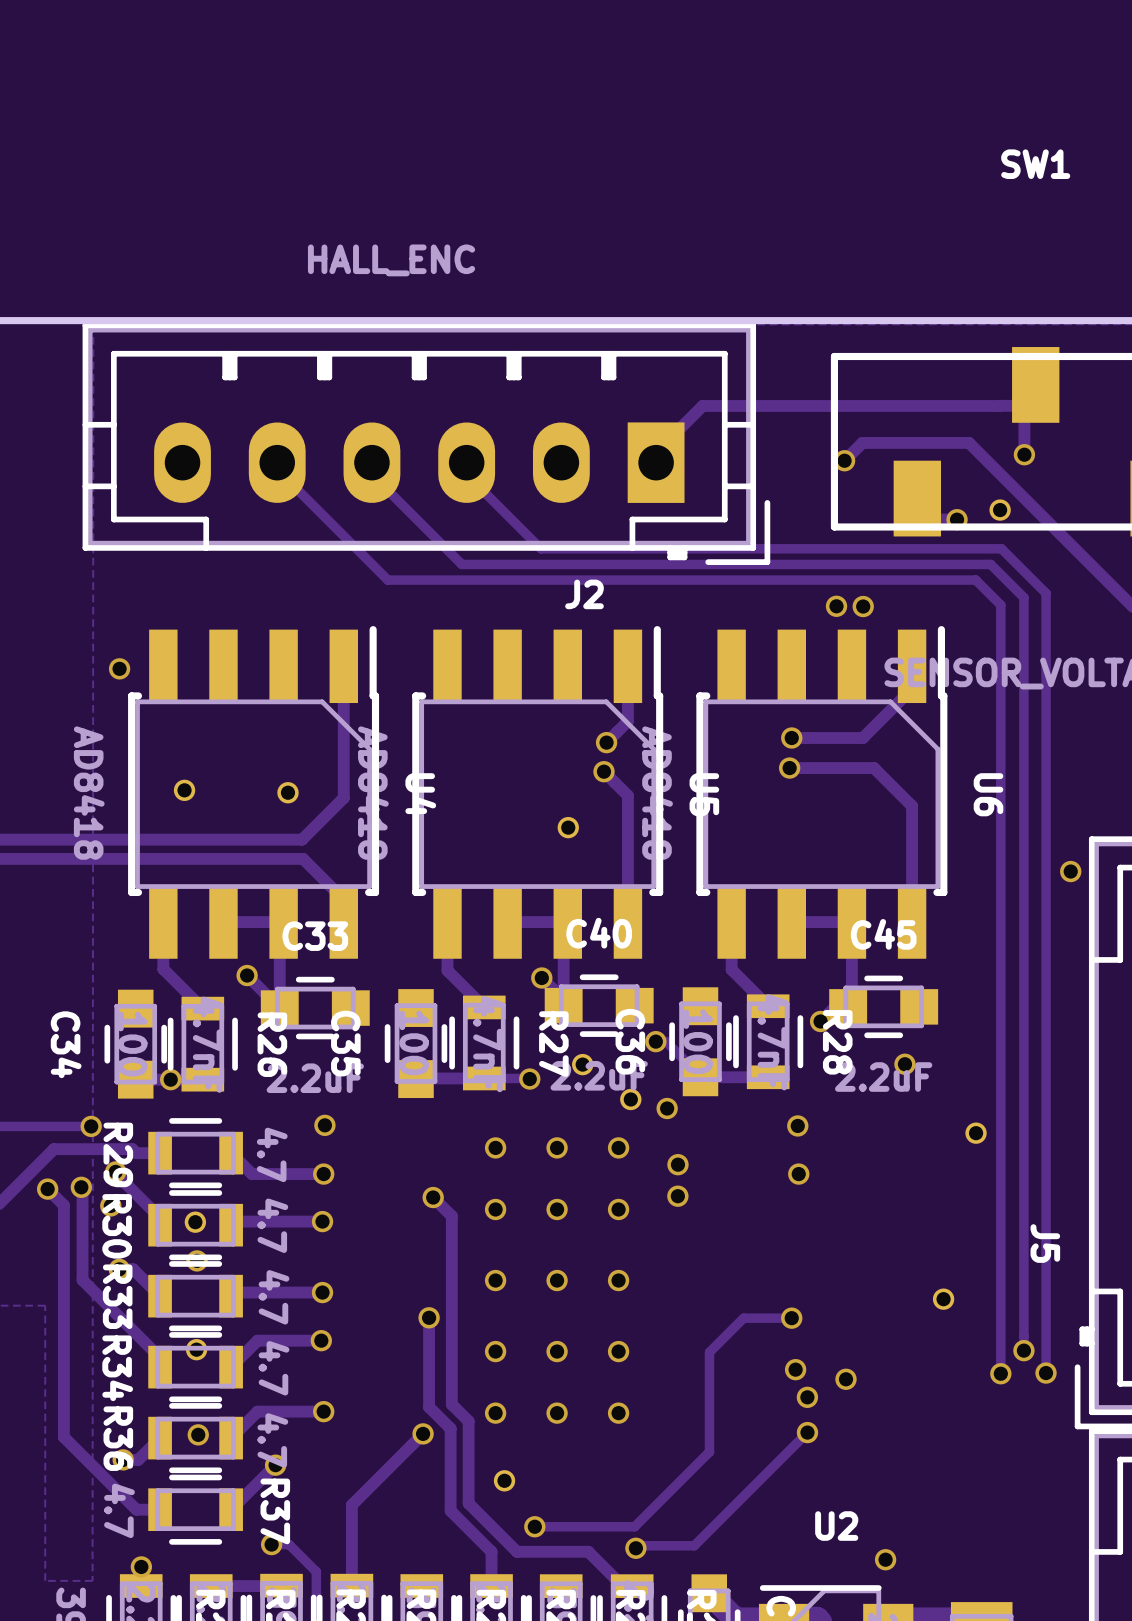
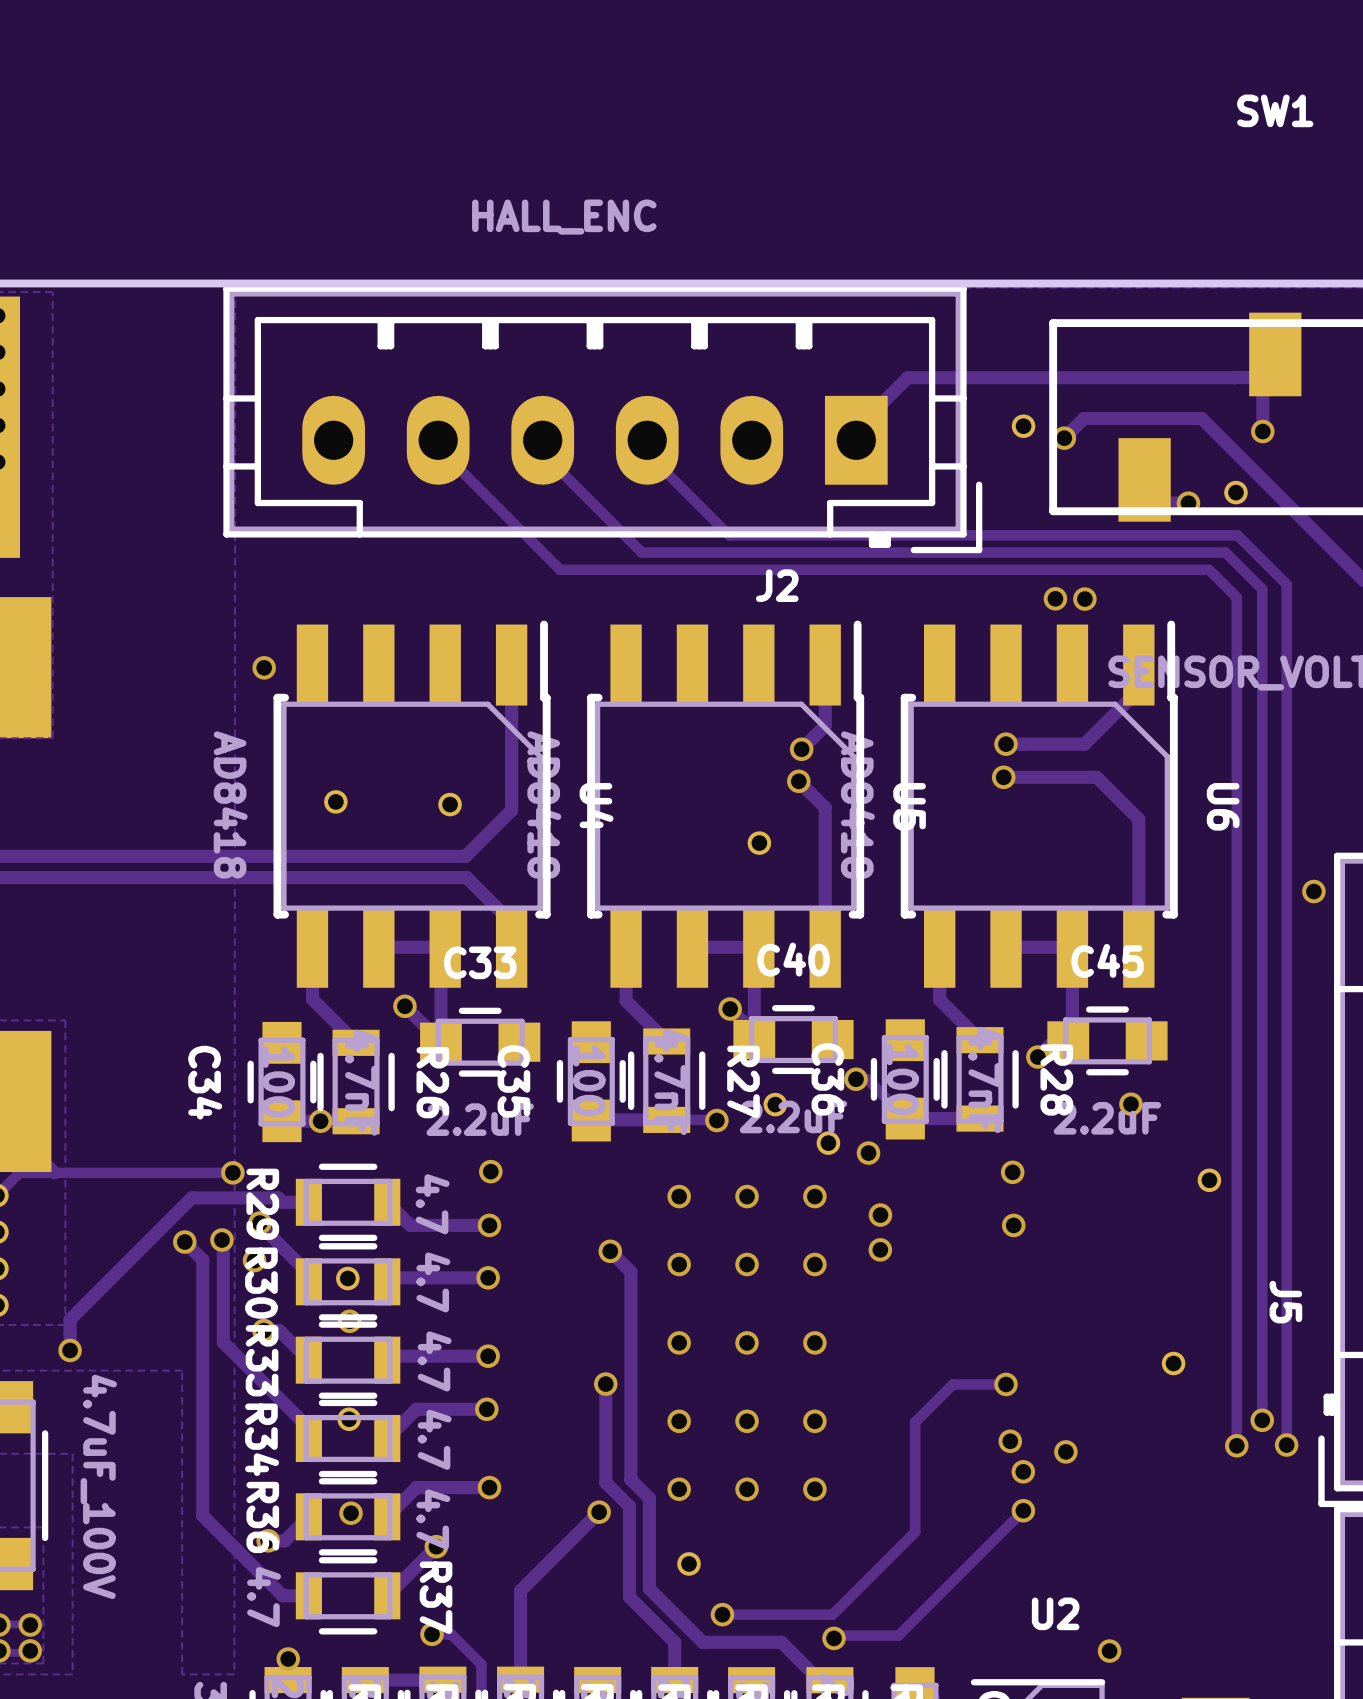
part: none -> (1023, 426)

